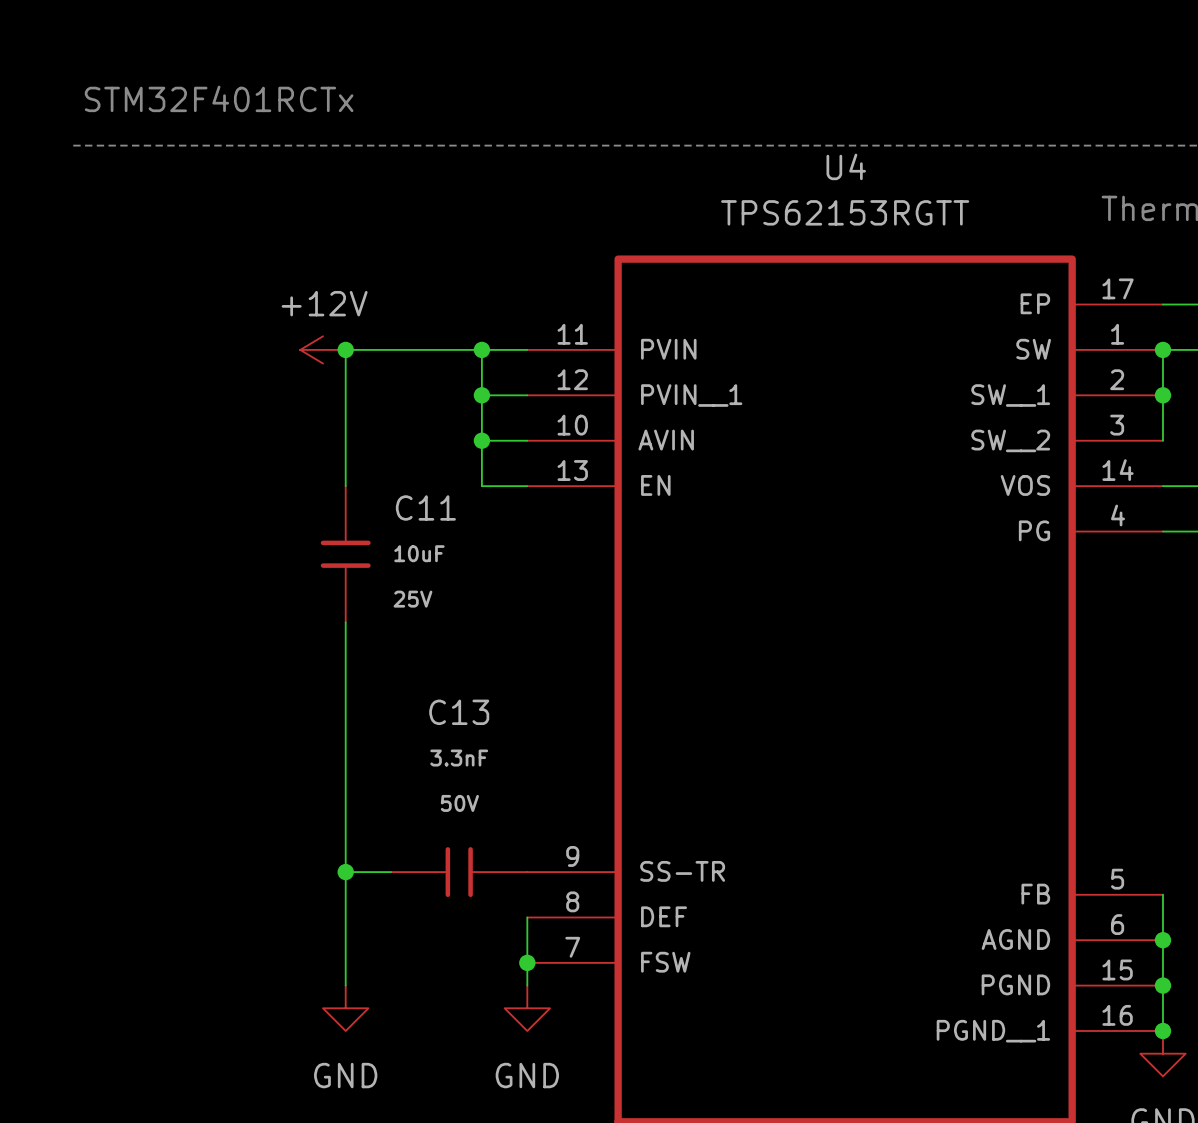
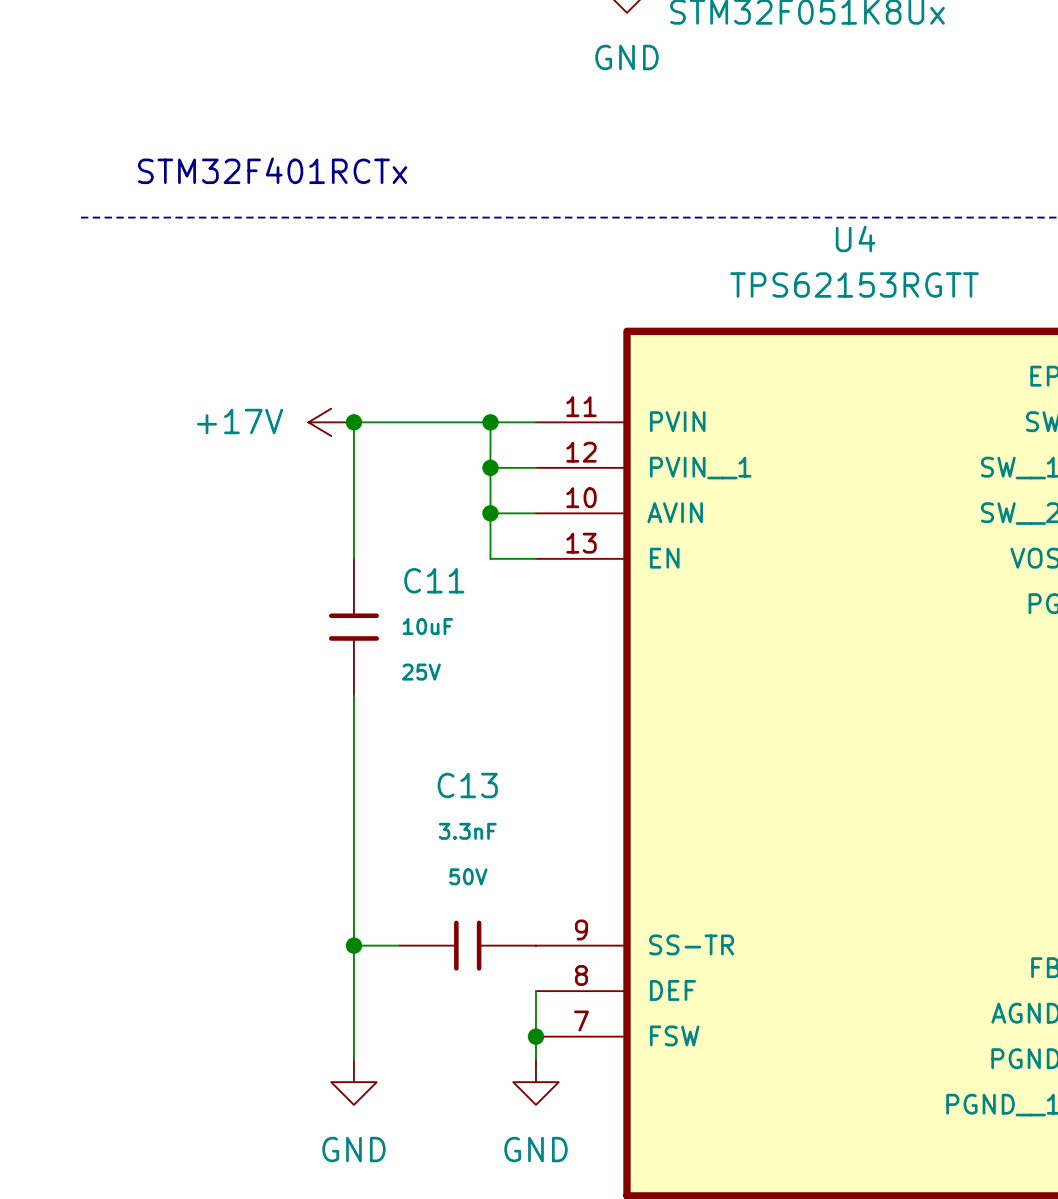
text position: STM32F401RCTx (219, 98) -> STM32F401RCTx (272, 170)
power symbol: +12V (323, 349) -> +17V (331, 422)

